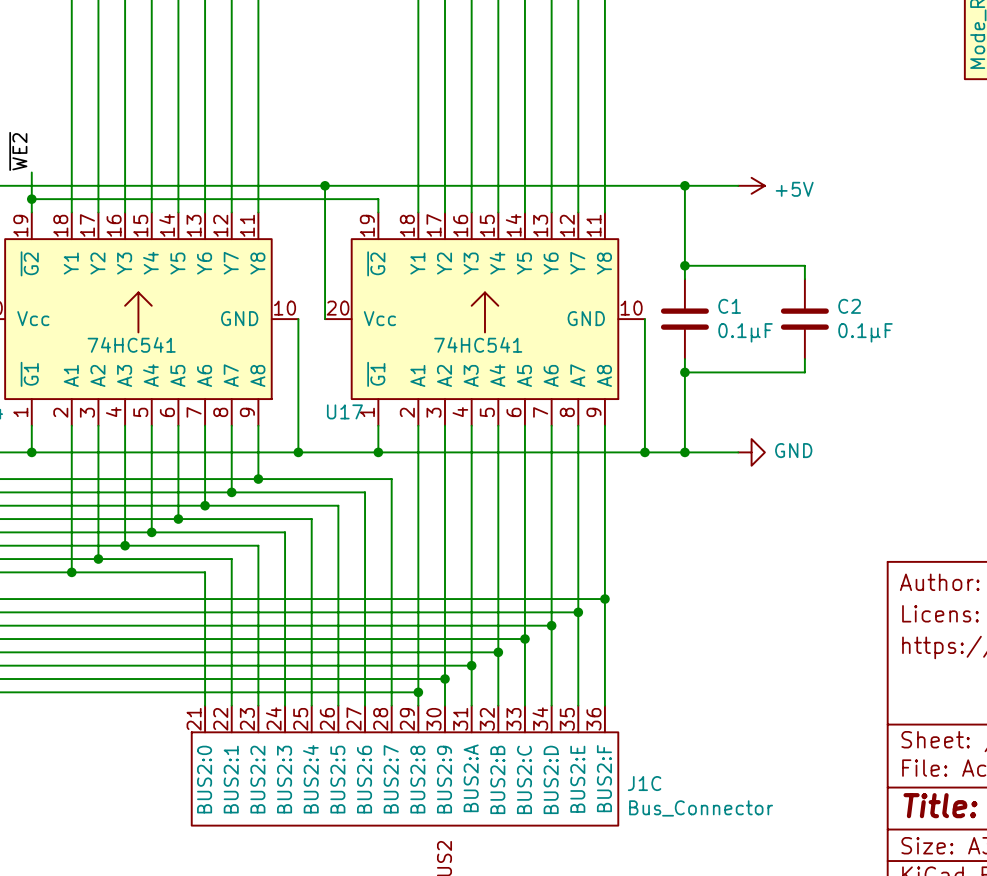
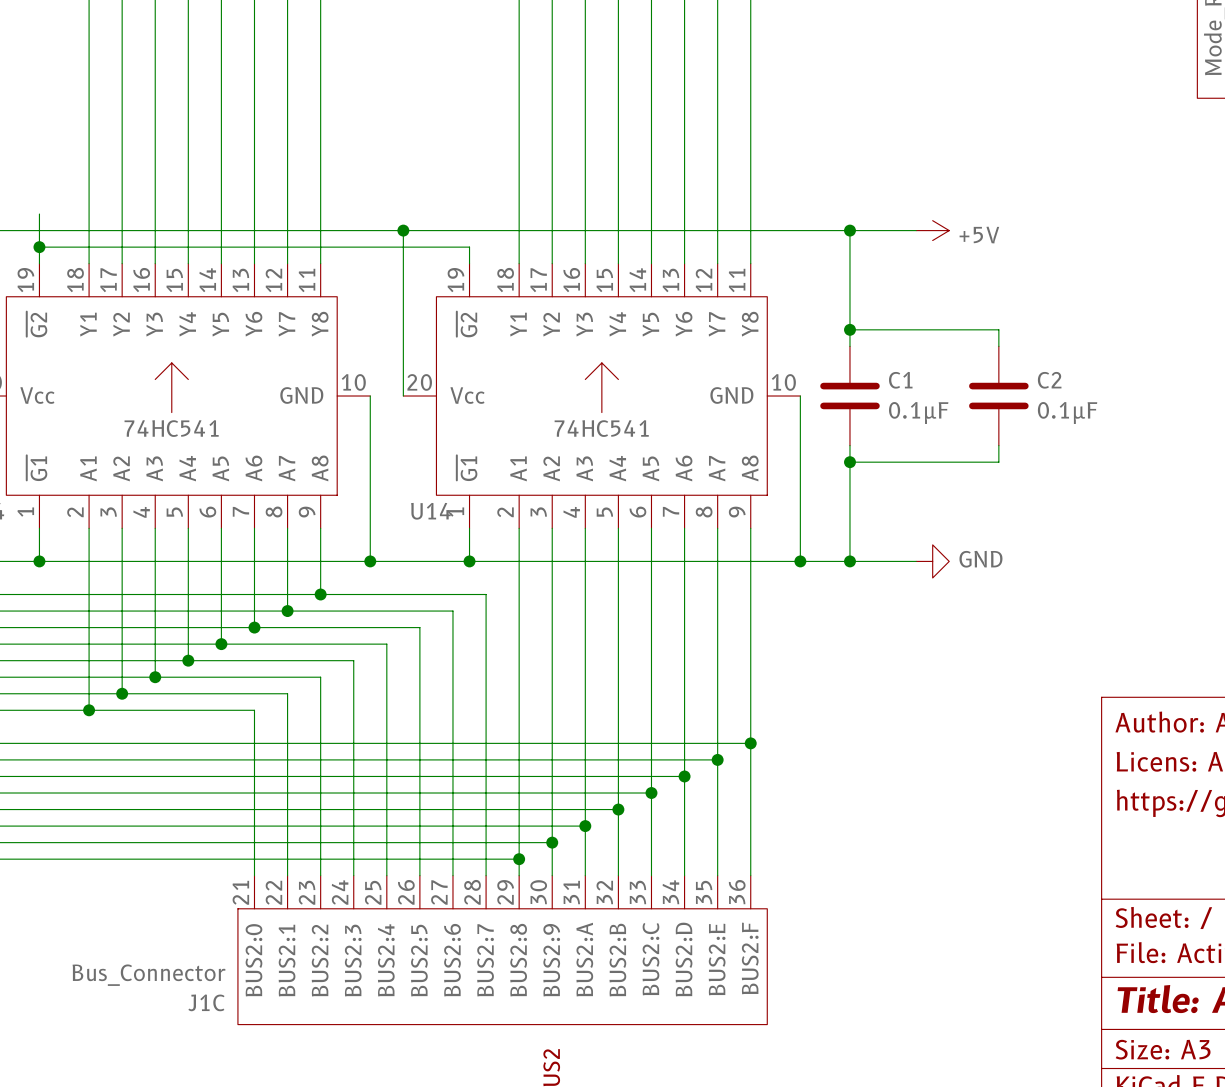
label: ~{WE2} (18, 151) -> none
U17 name: U17 (344, 411) -> U14 (430, 511)
J1C name position: J1C (644, 783) -> J1C (206, 1002)
J1C value position: Bus_Connector (701, 808) -> Bus_Connector (148, 975)

